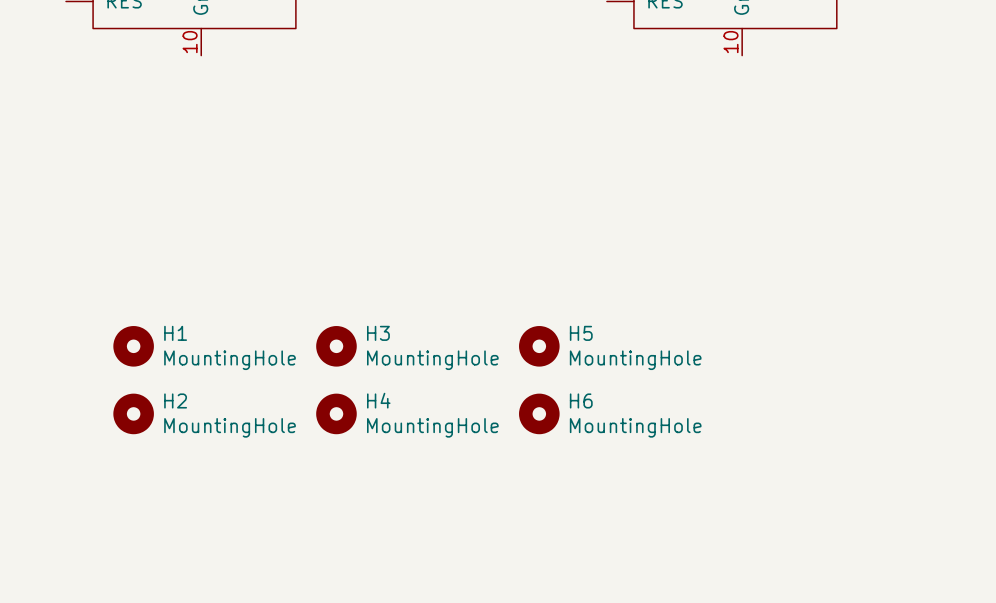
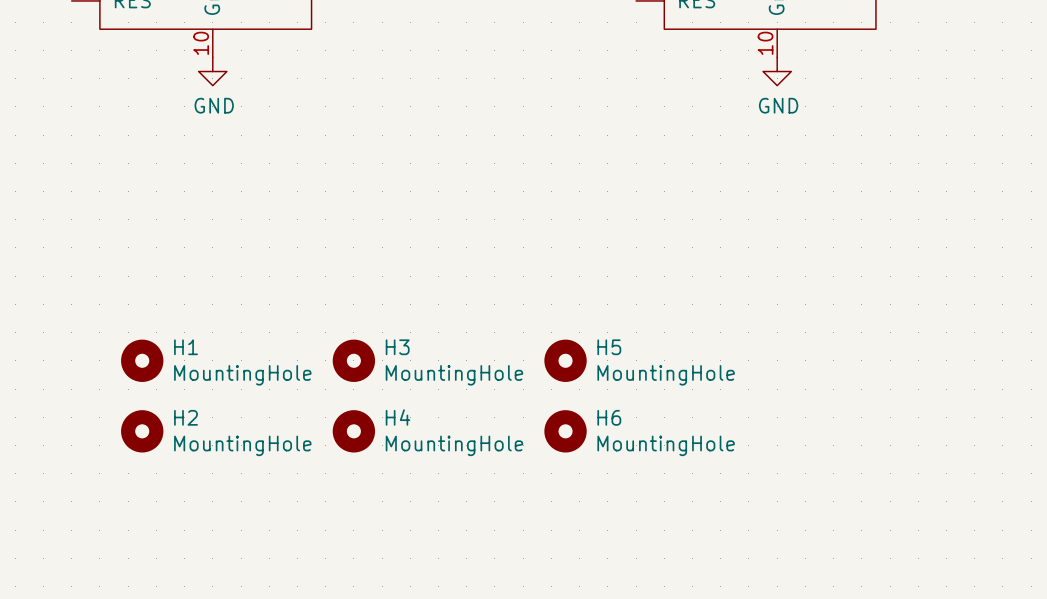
power symbol: none -> GND (212, 71)
power symbol: none -> GND (777, 71)

